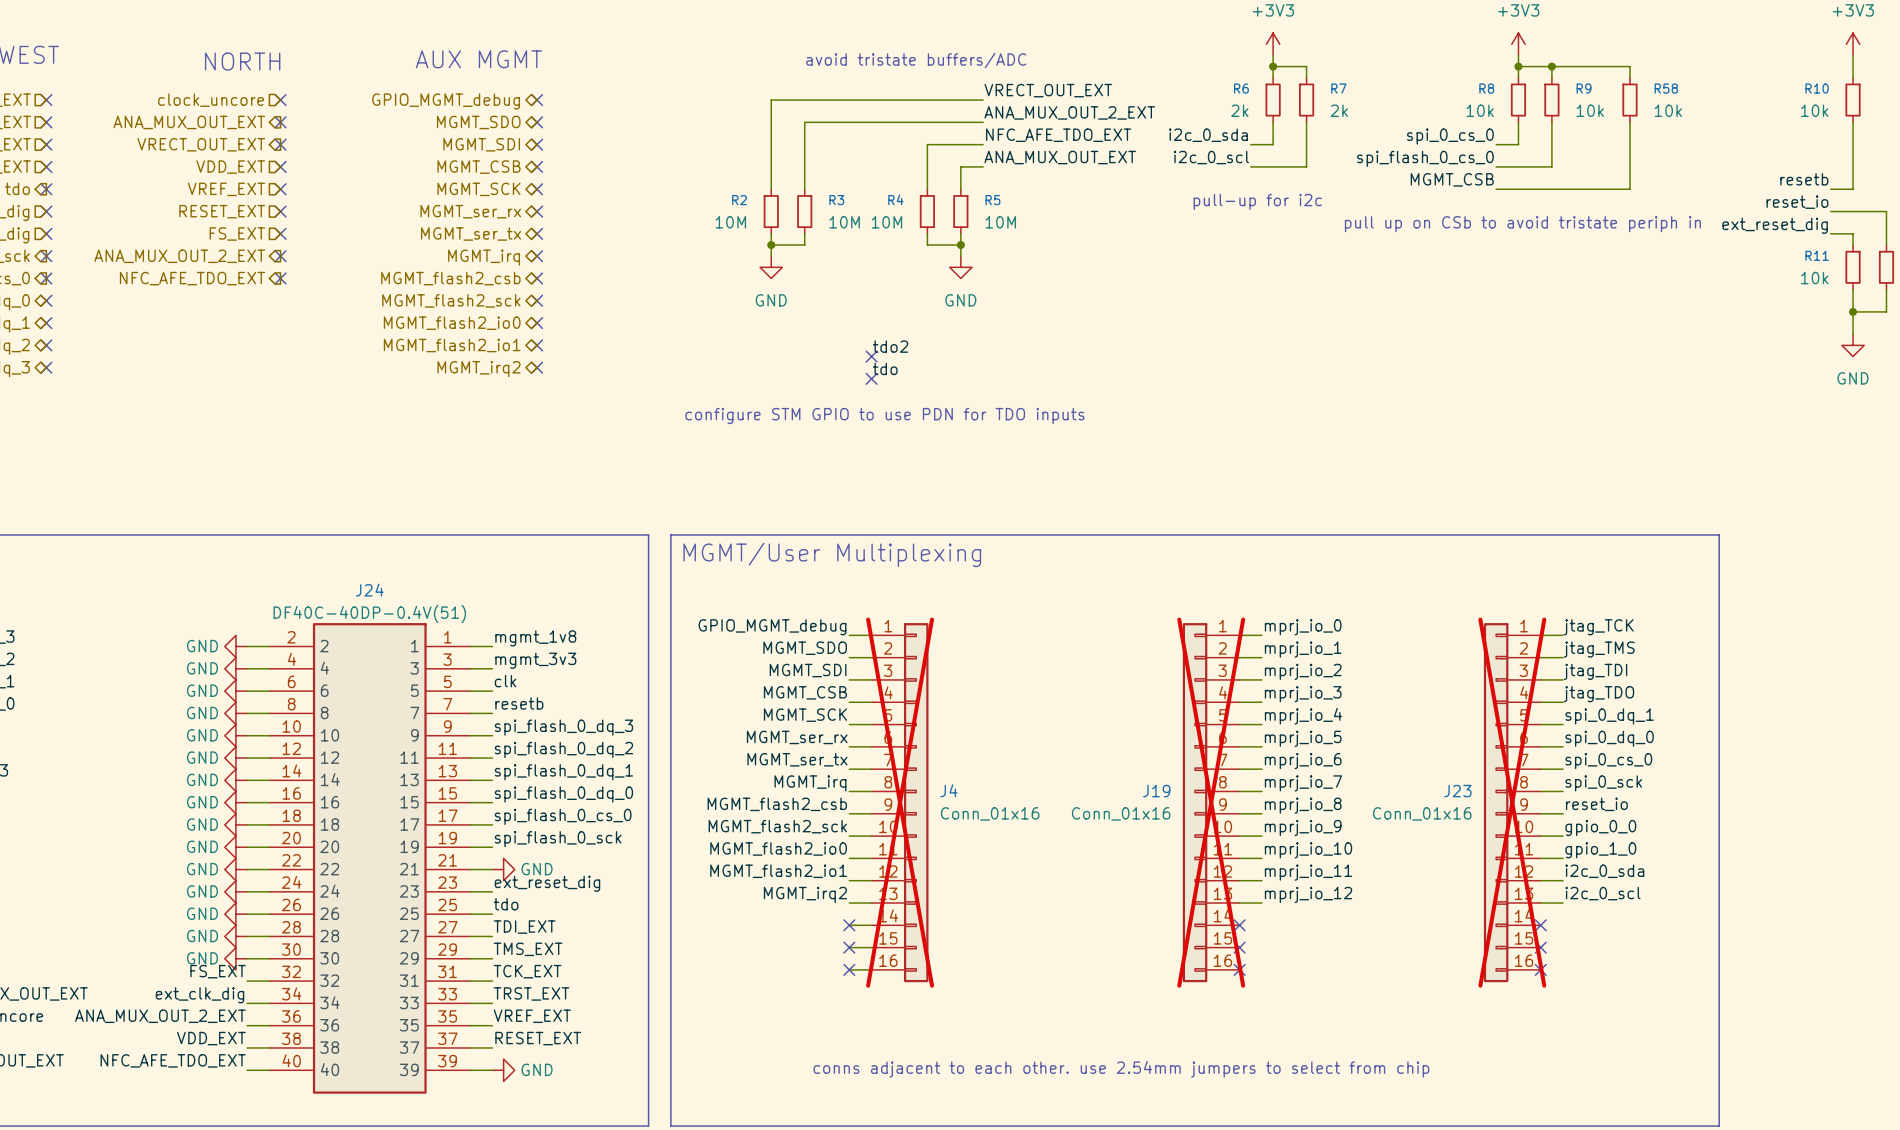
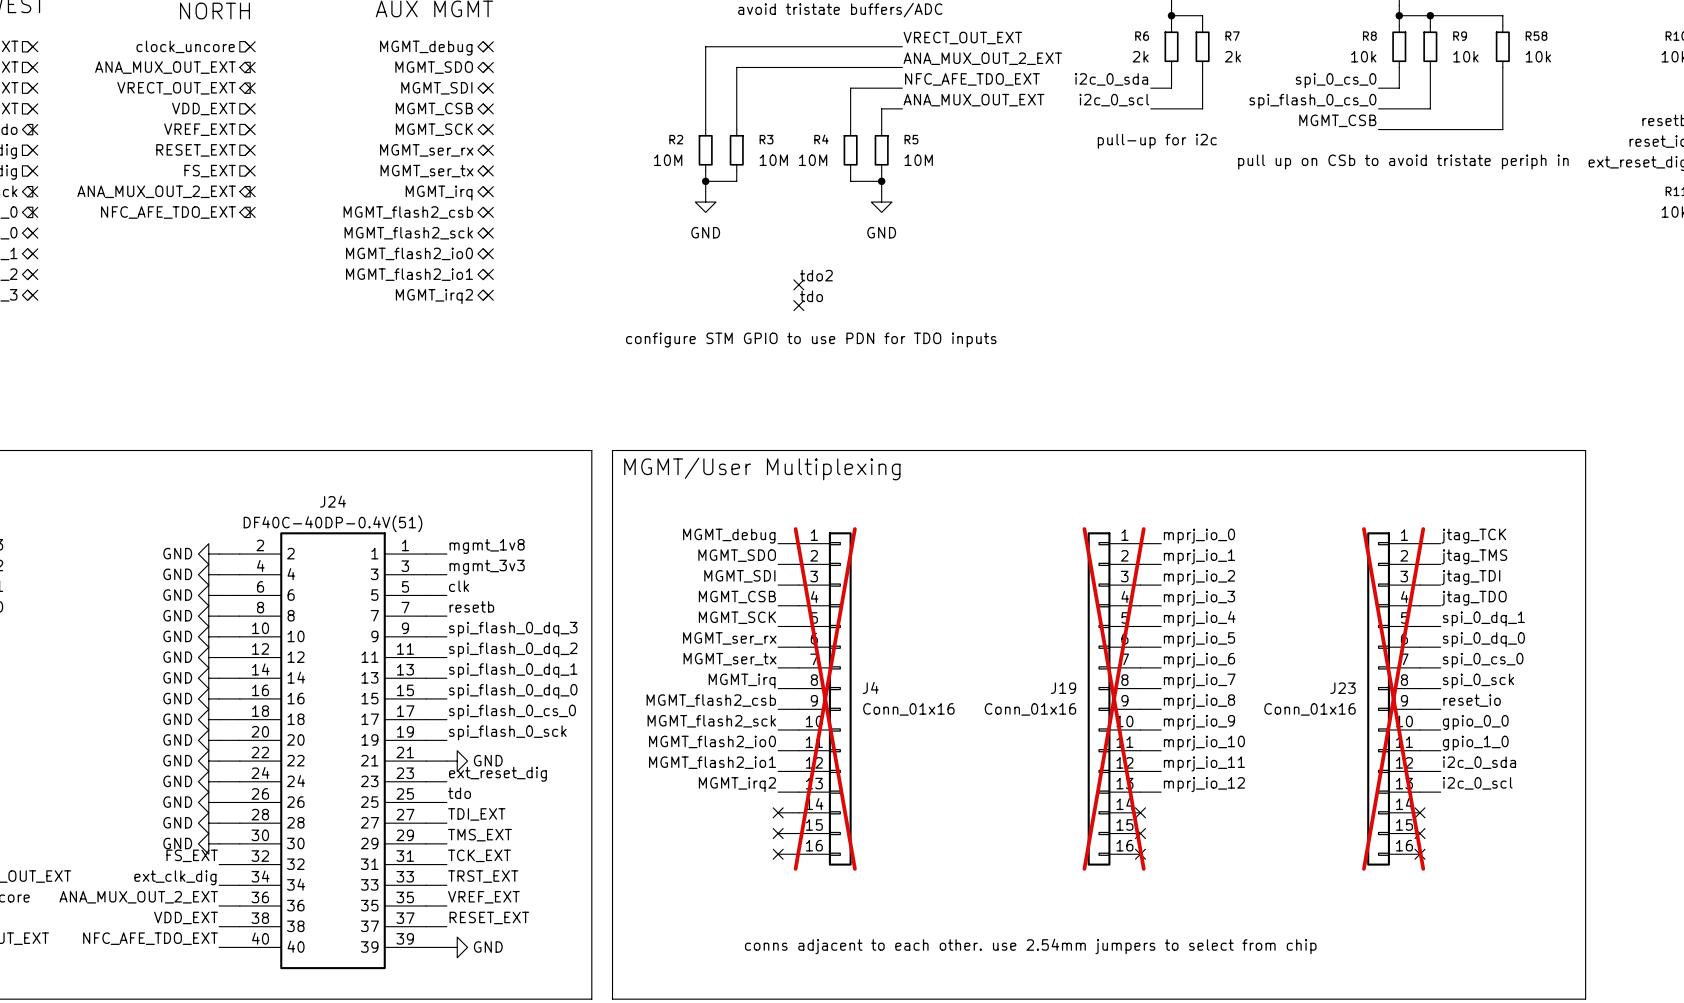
hierarchical label: GPIO_MGMT_debug (446, 101) -> MGMT_debug (426, 48)
label: GPIO_MGMT_debug (772, 627) -> MGMT_debug (729, 536)

